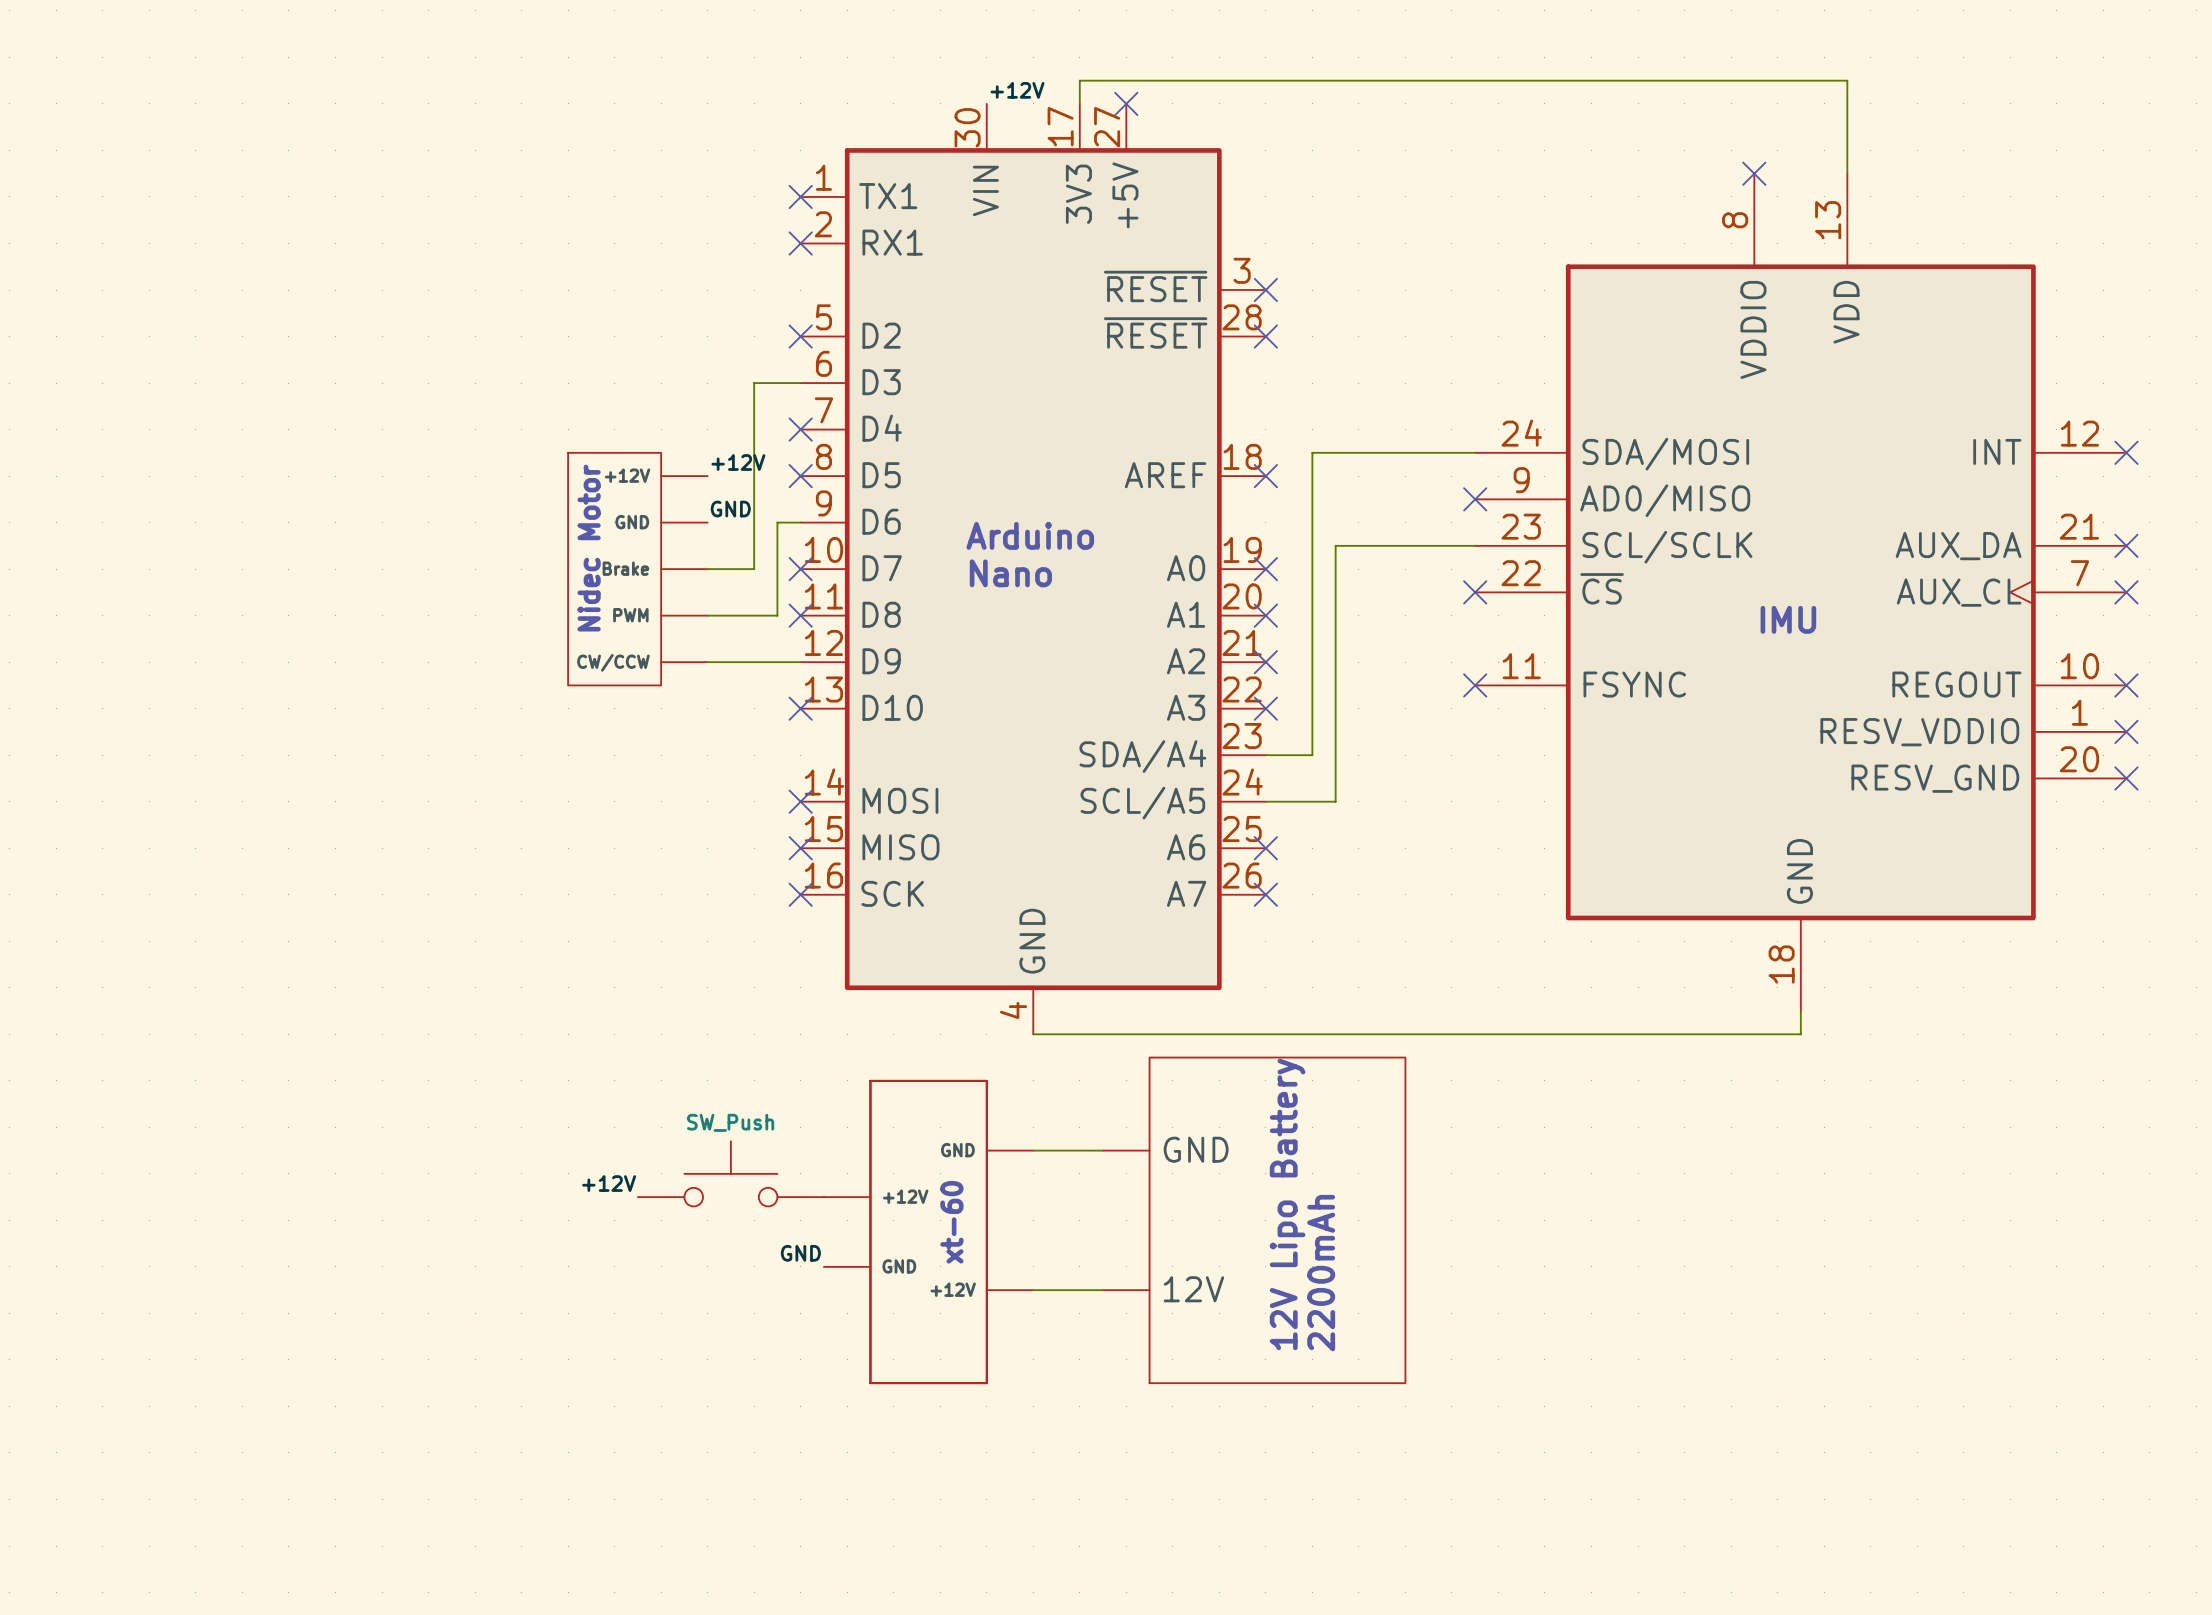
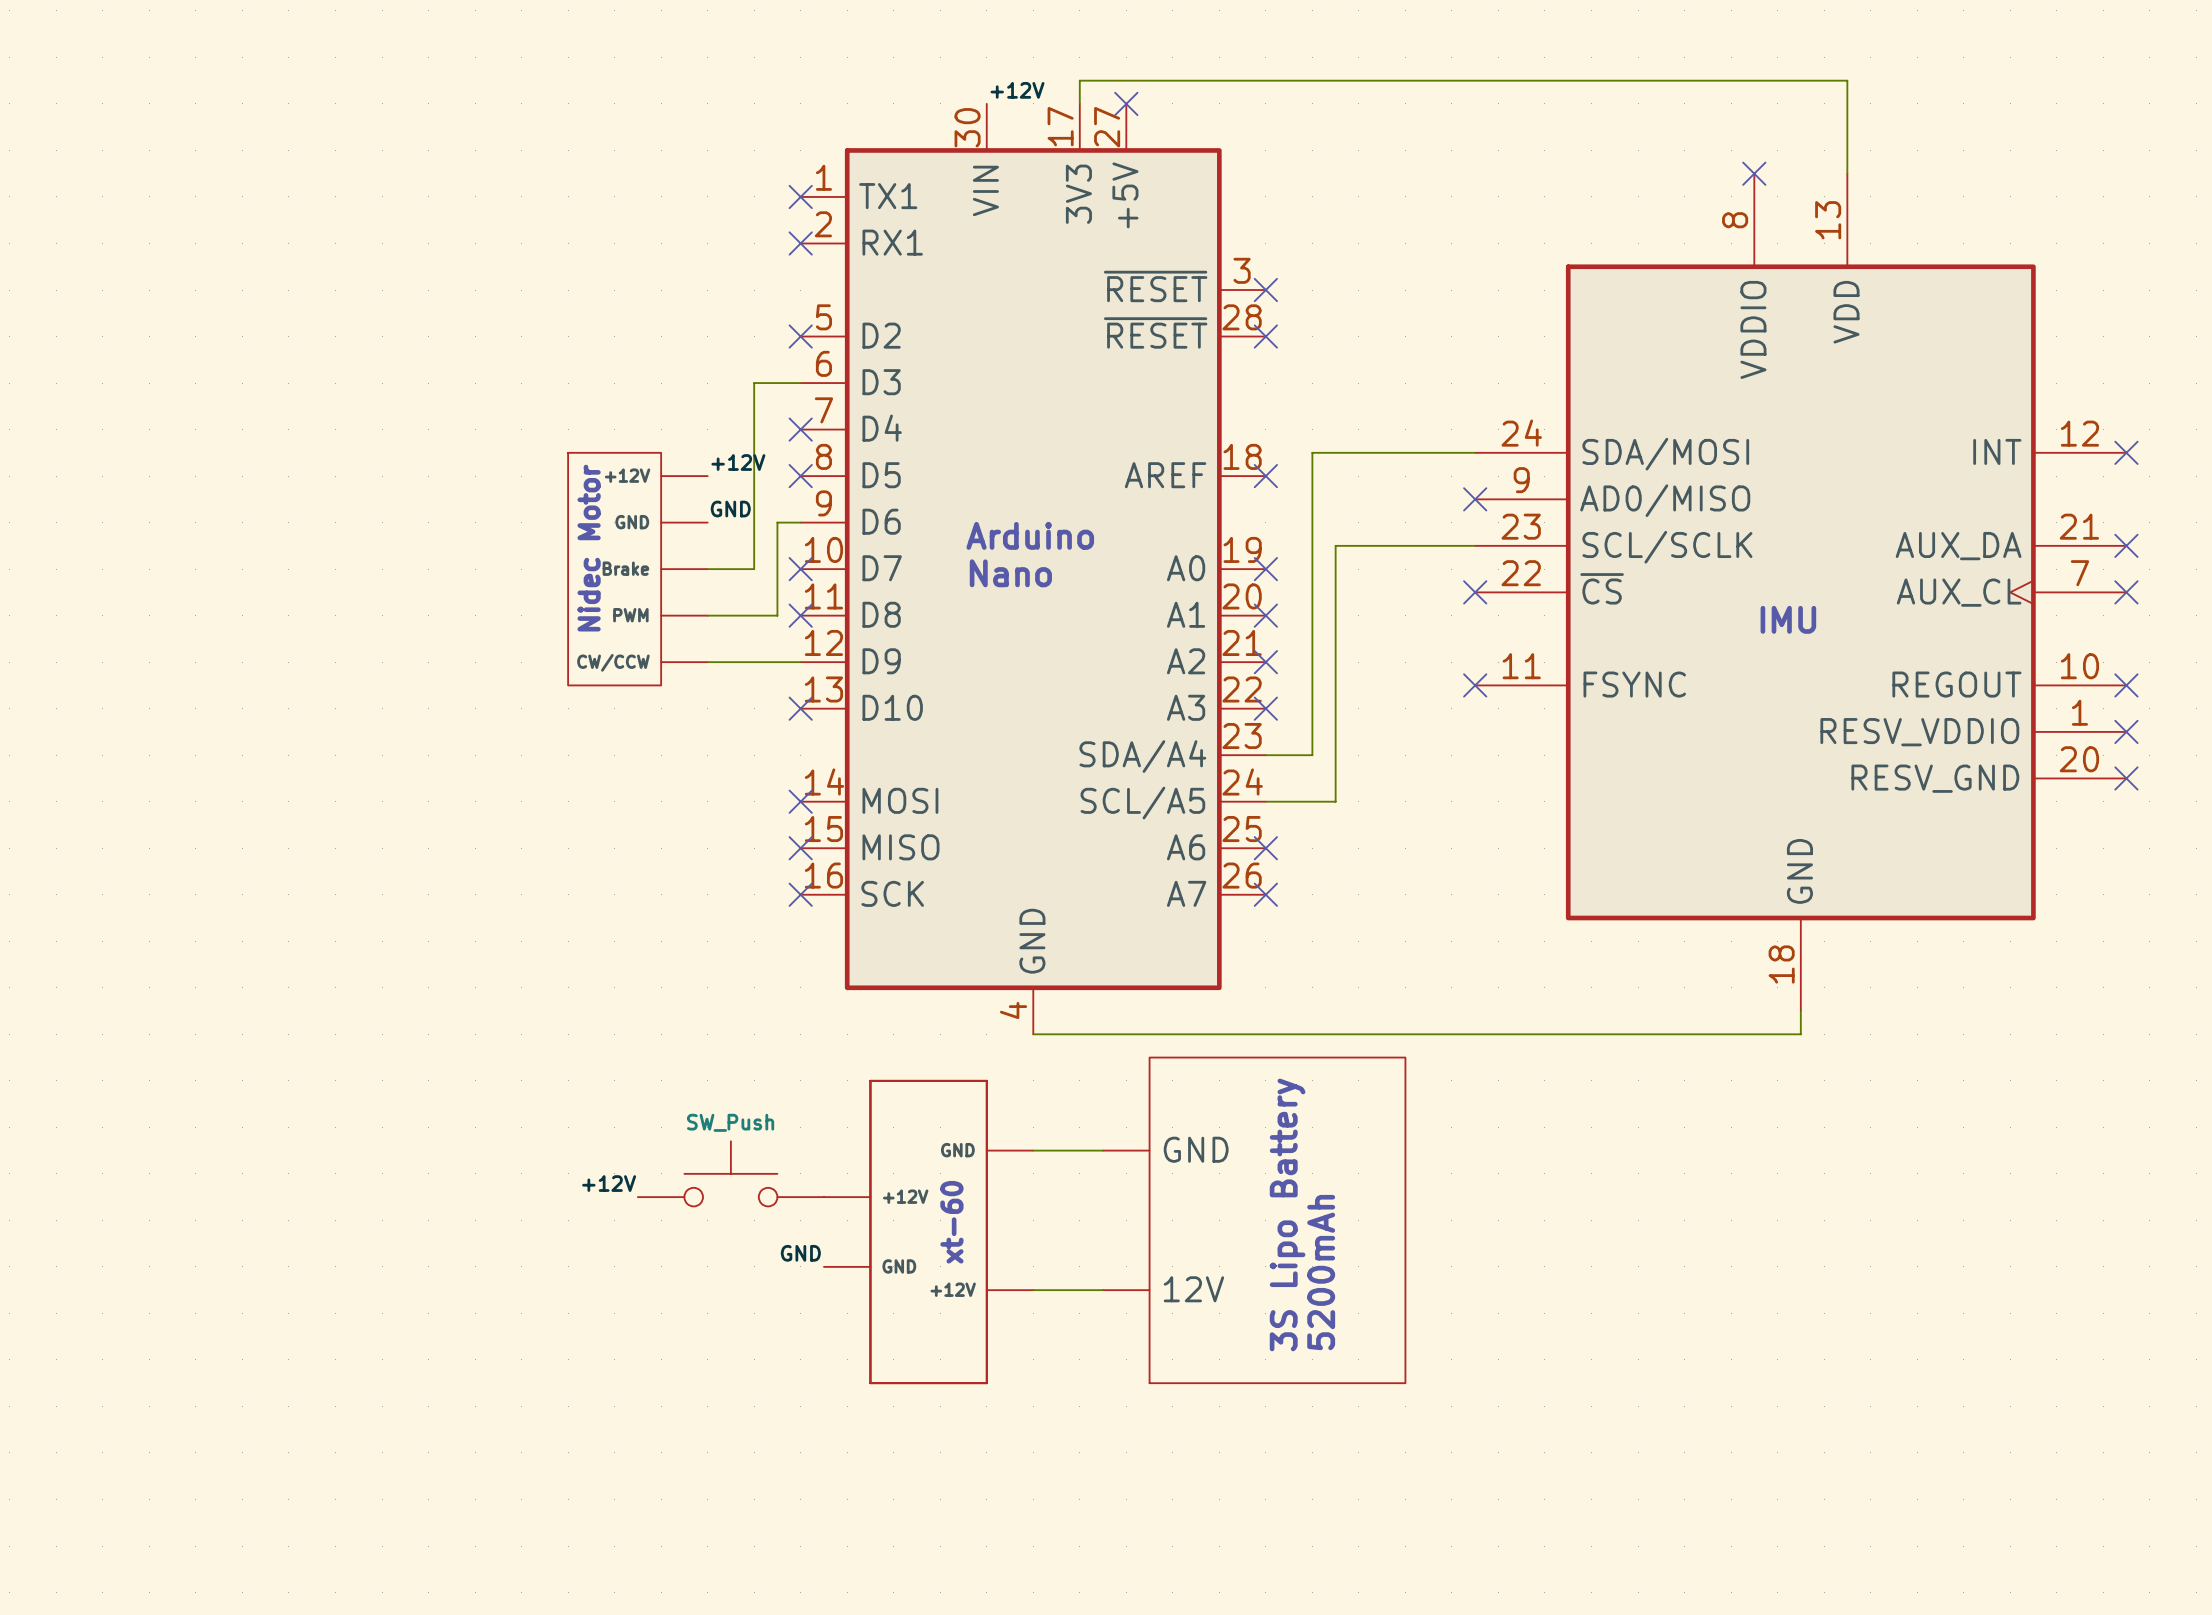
text: 12V Lipo Battery (1287, 1204) -> 3S Lipo Battery (1287, 1214)
text: 2200mAh (1321, 1273) -> 5200mAh (1321, 1272)

